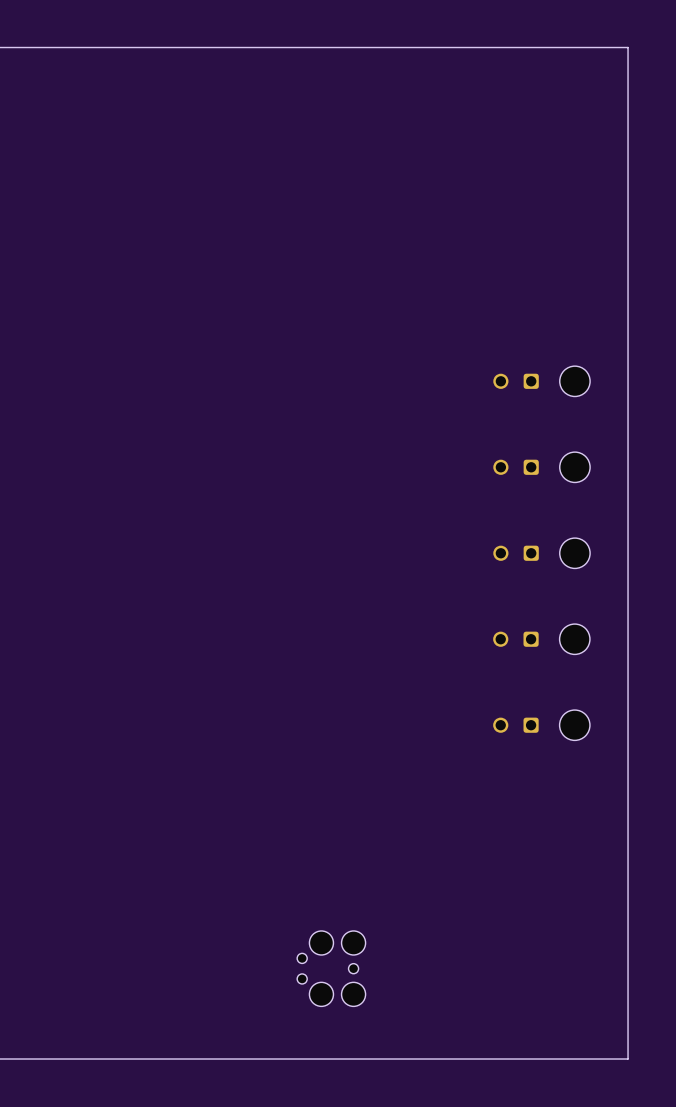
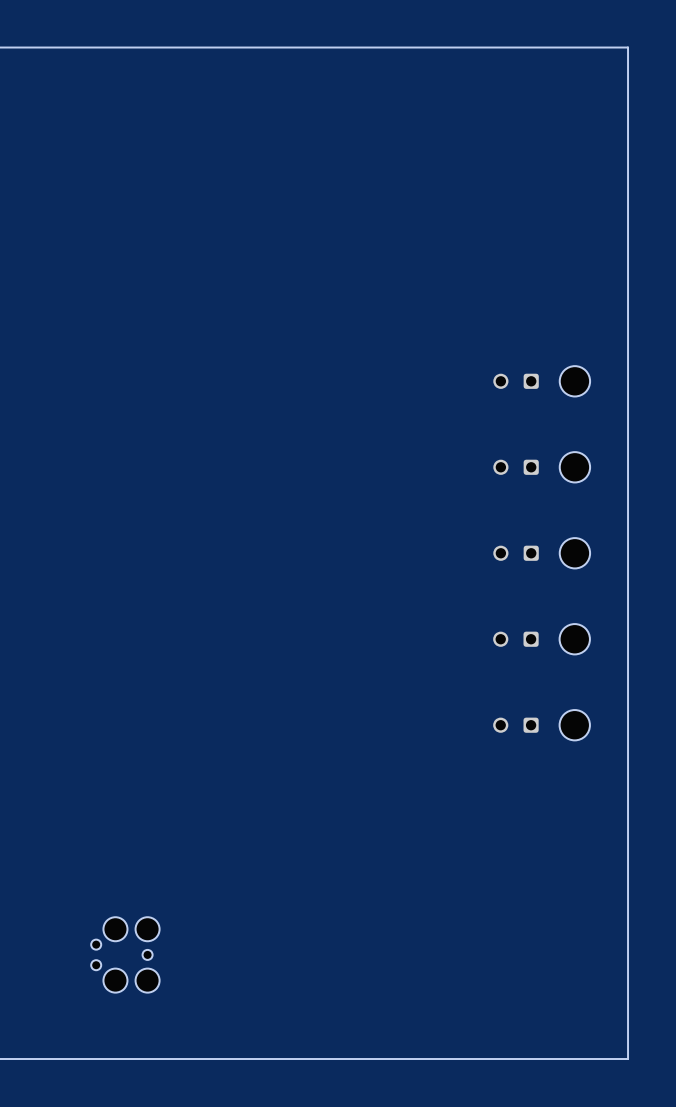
part position: (331, 968) -> (125, 954)

